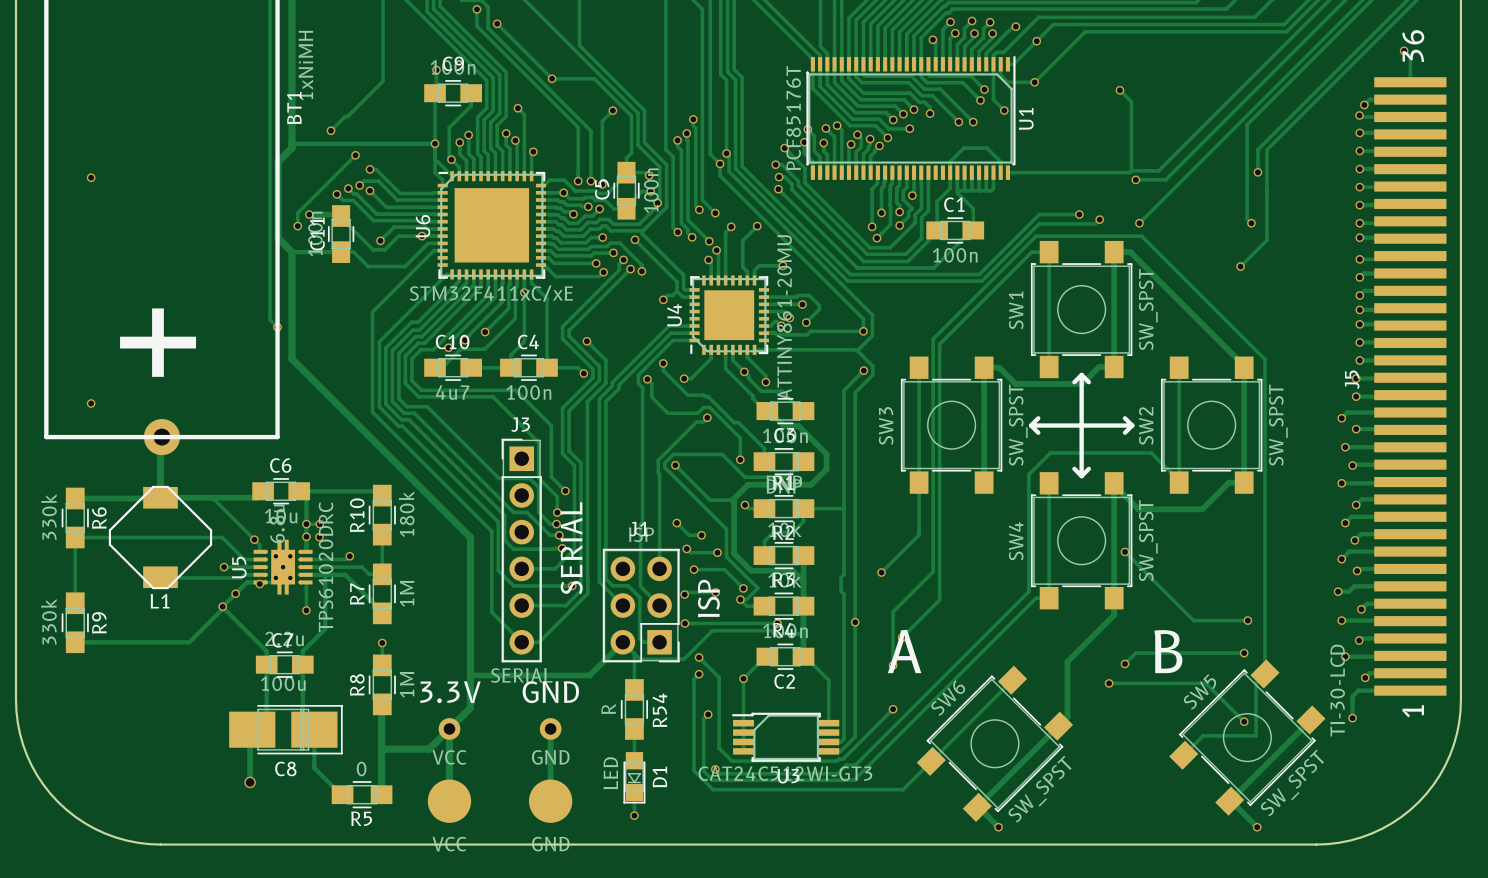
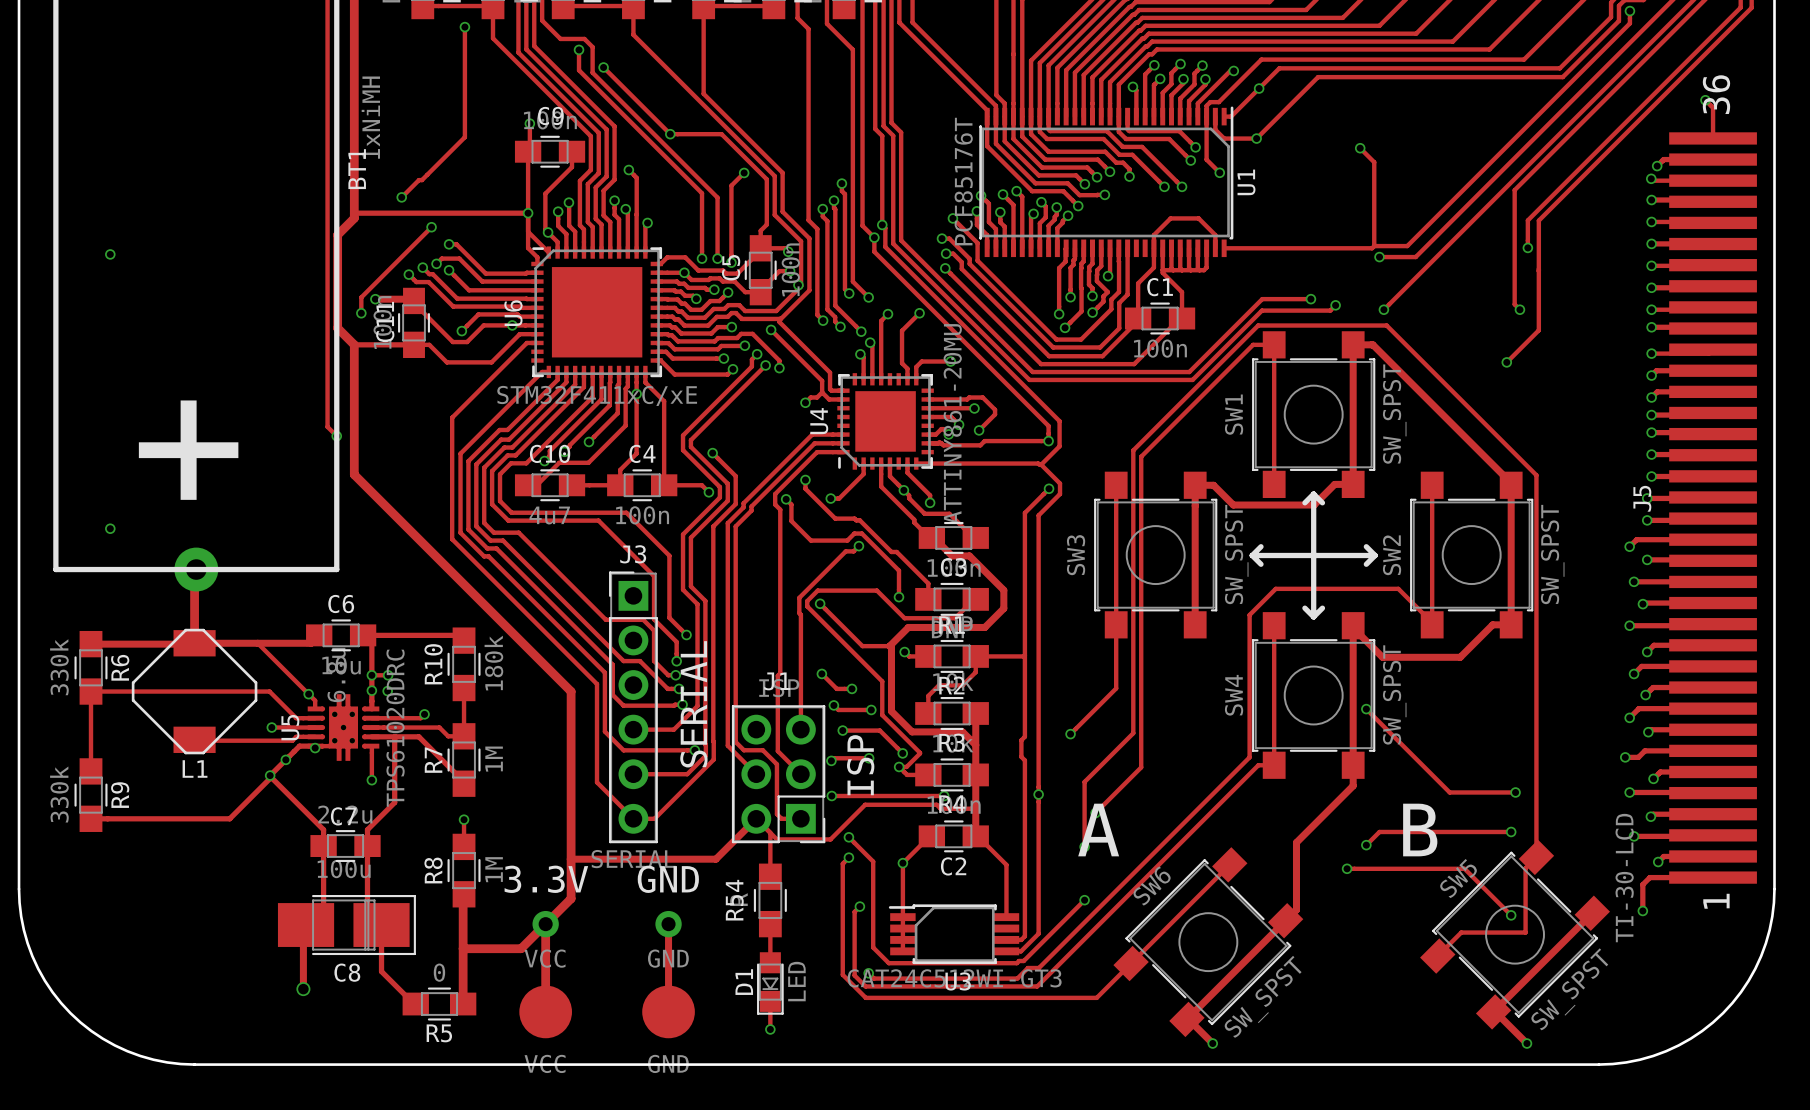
R54 name position: R54 (659, 710) -> R54 (734, 900)
D1 value position: LED (610, 773) -> LED (796, 981)
D1 name position: D1 (659, 777) -> D1 (744, 982)

